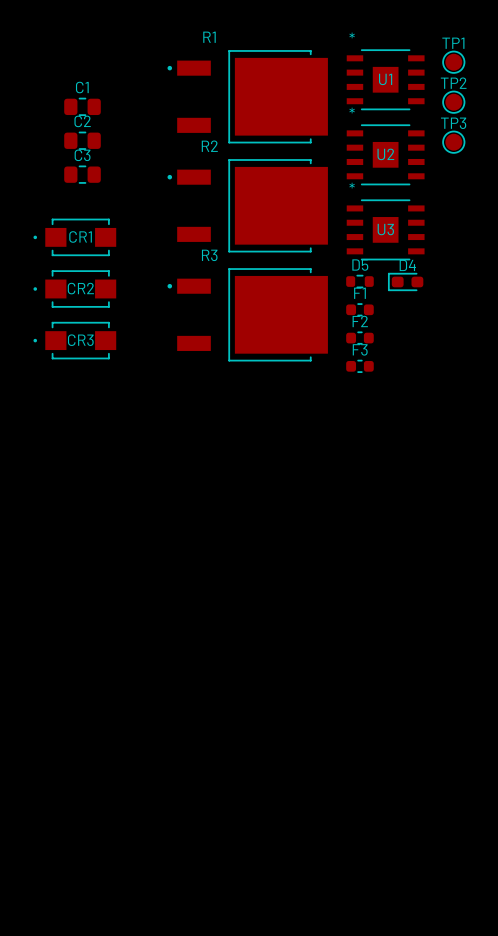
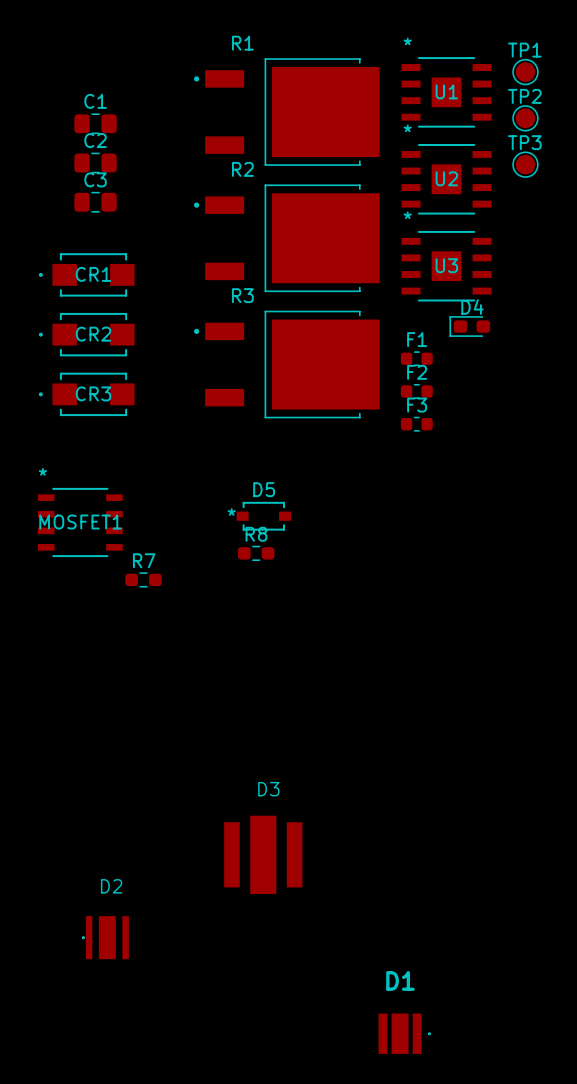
D5 footprint: [346, 274, 374, 289] -> [236, 501, 291, 531]
MOSFET1: none -> (80, 522)
R8: none -> (256, 553)
R7: none -> (143, 579)
D3: none -> (263, 854)
D2: none -> (105, 937)
D1: none -> (404, 1033)

